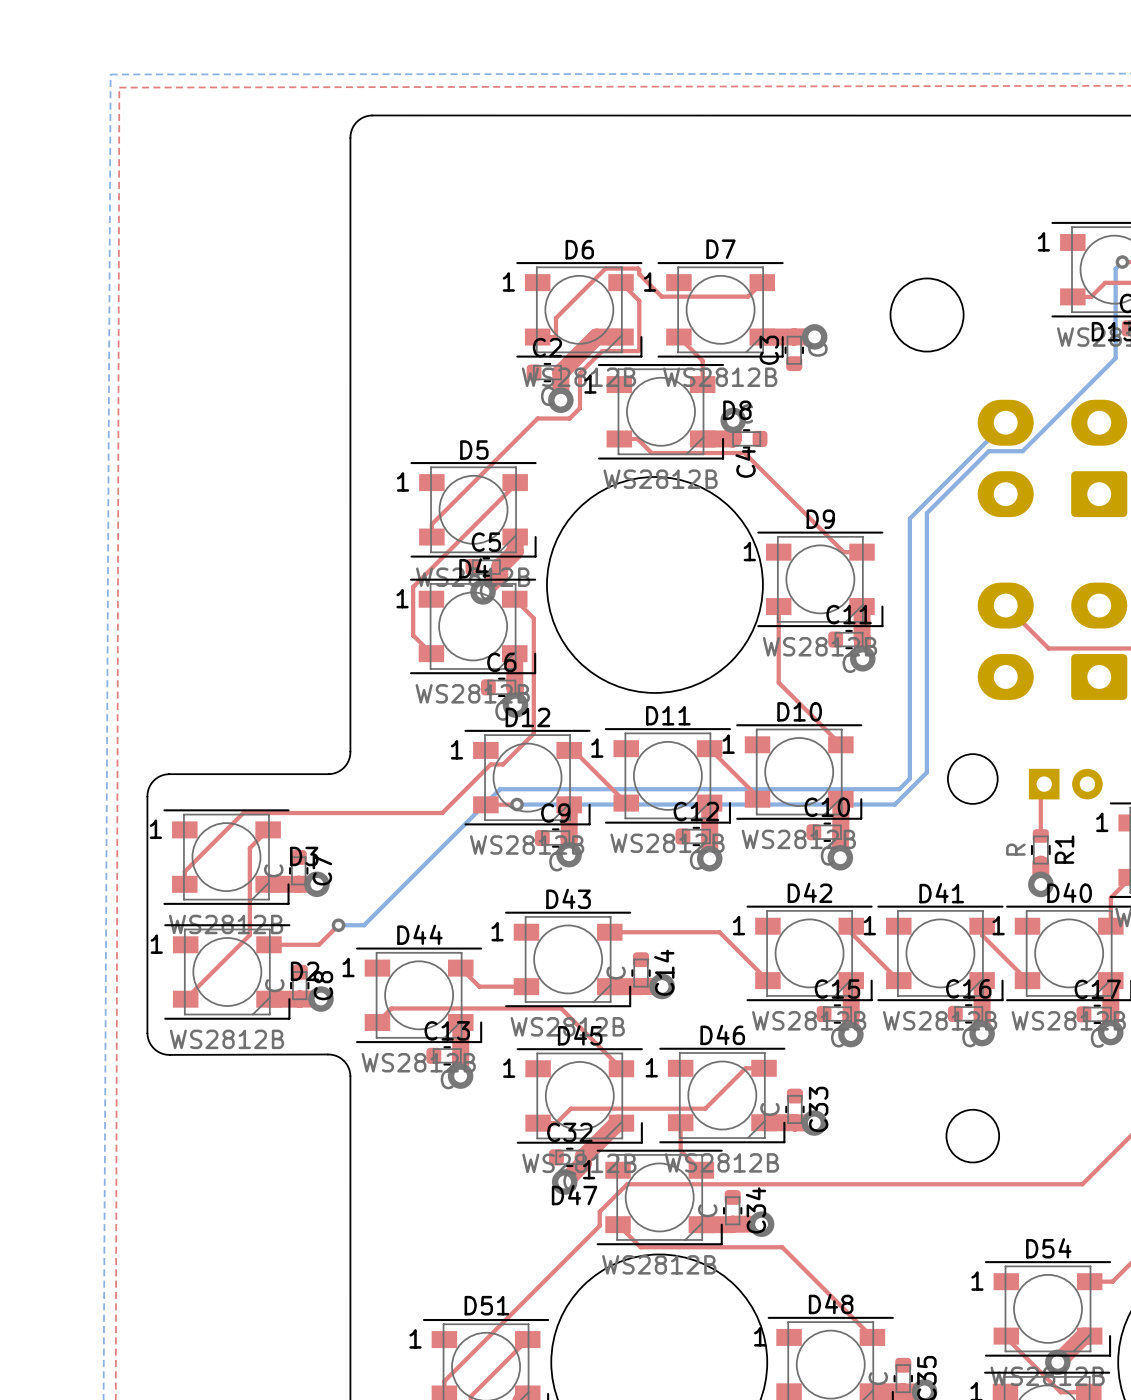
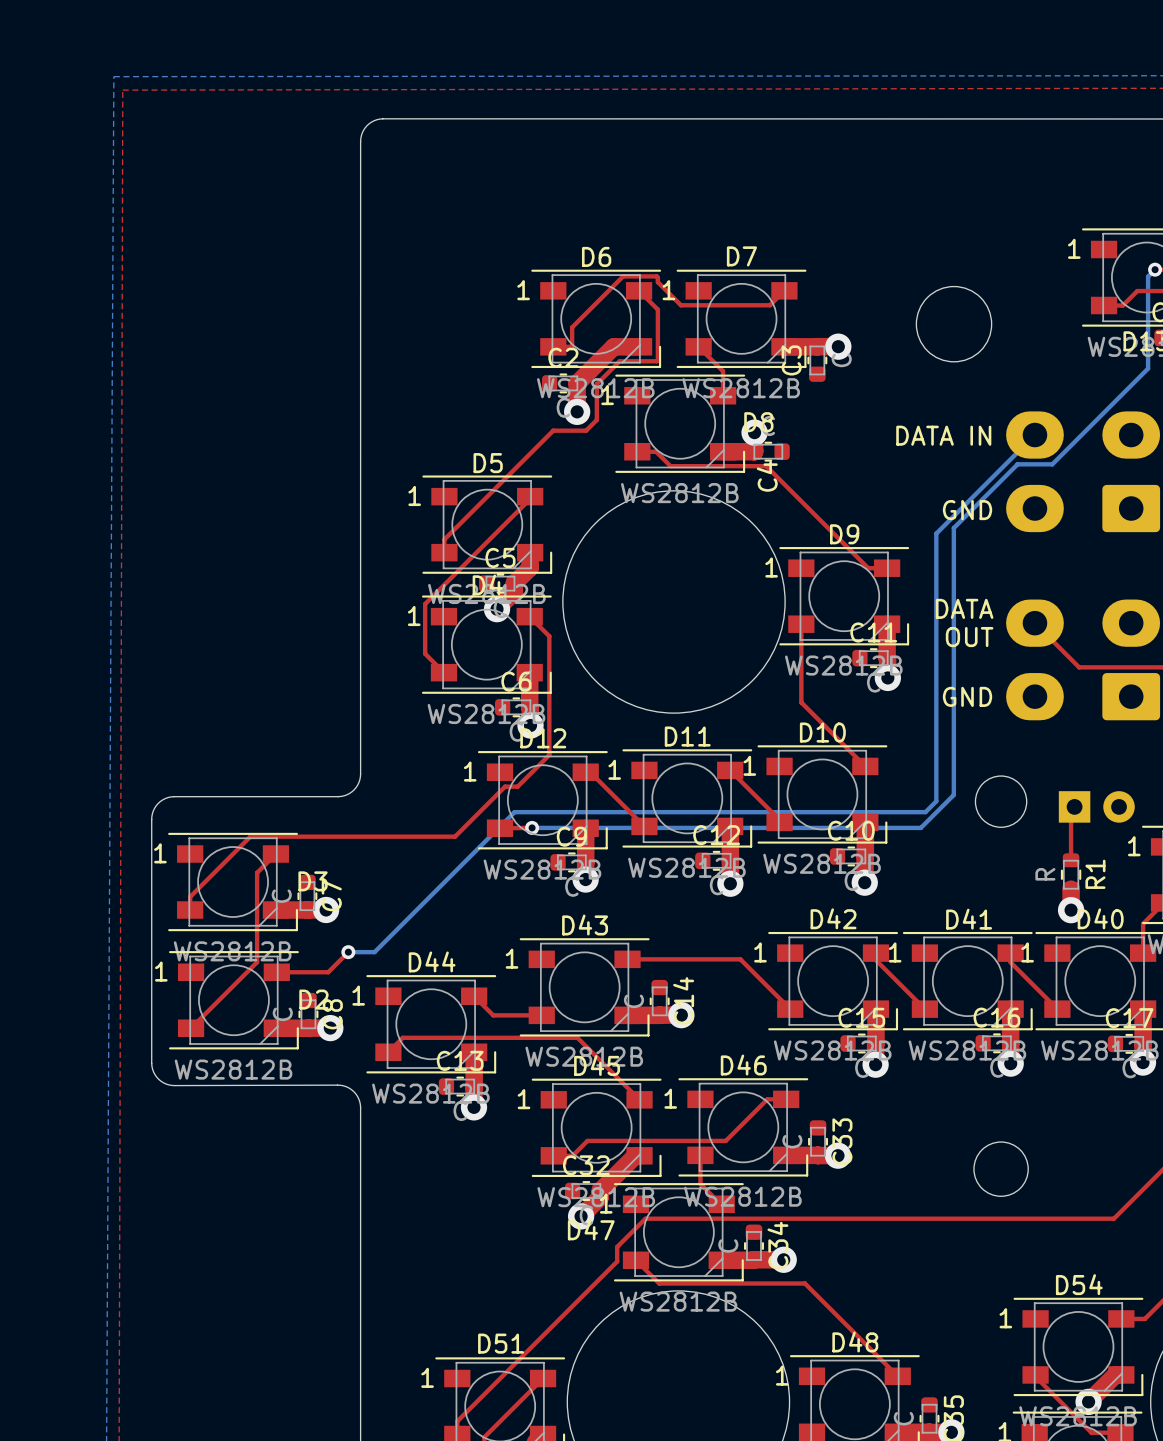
text: none -> DATA IN (943, 435)
text: none -> GND (967, 510)
text: none -> DATA (964, 608)
text: none -> OUT (969, 637)
text: none -> GND (967, 696)

